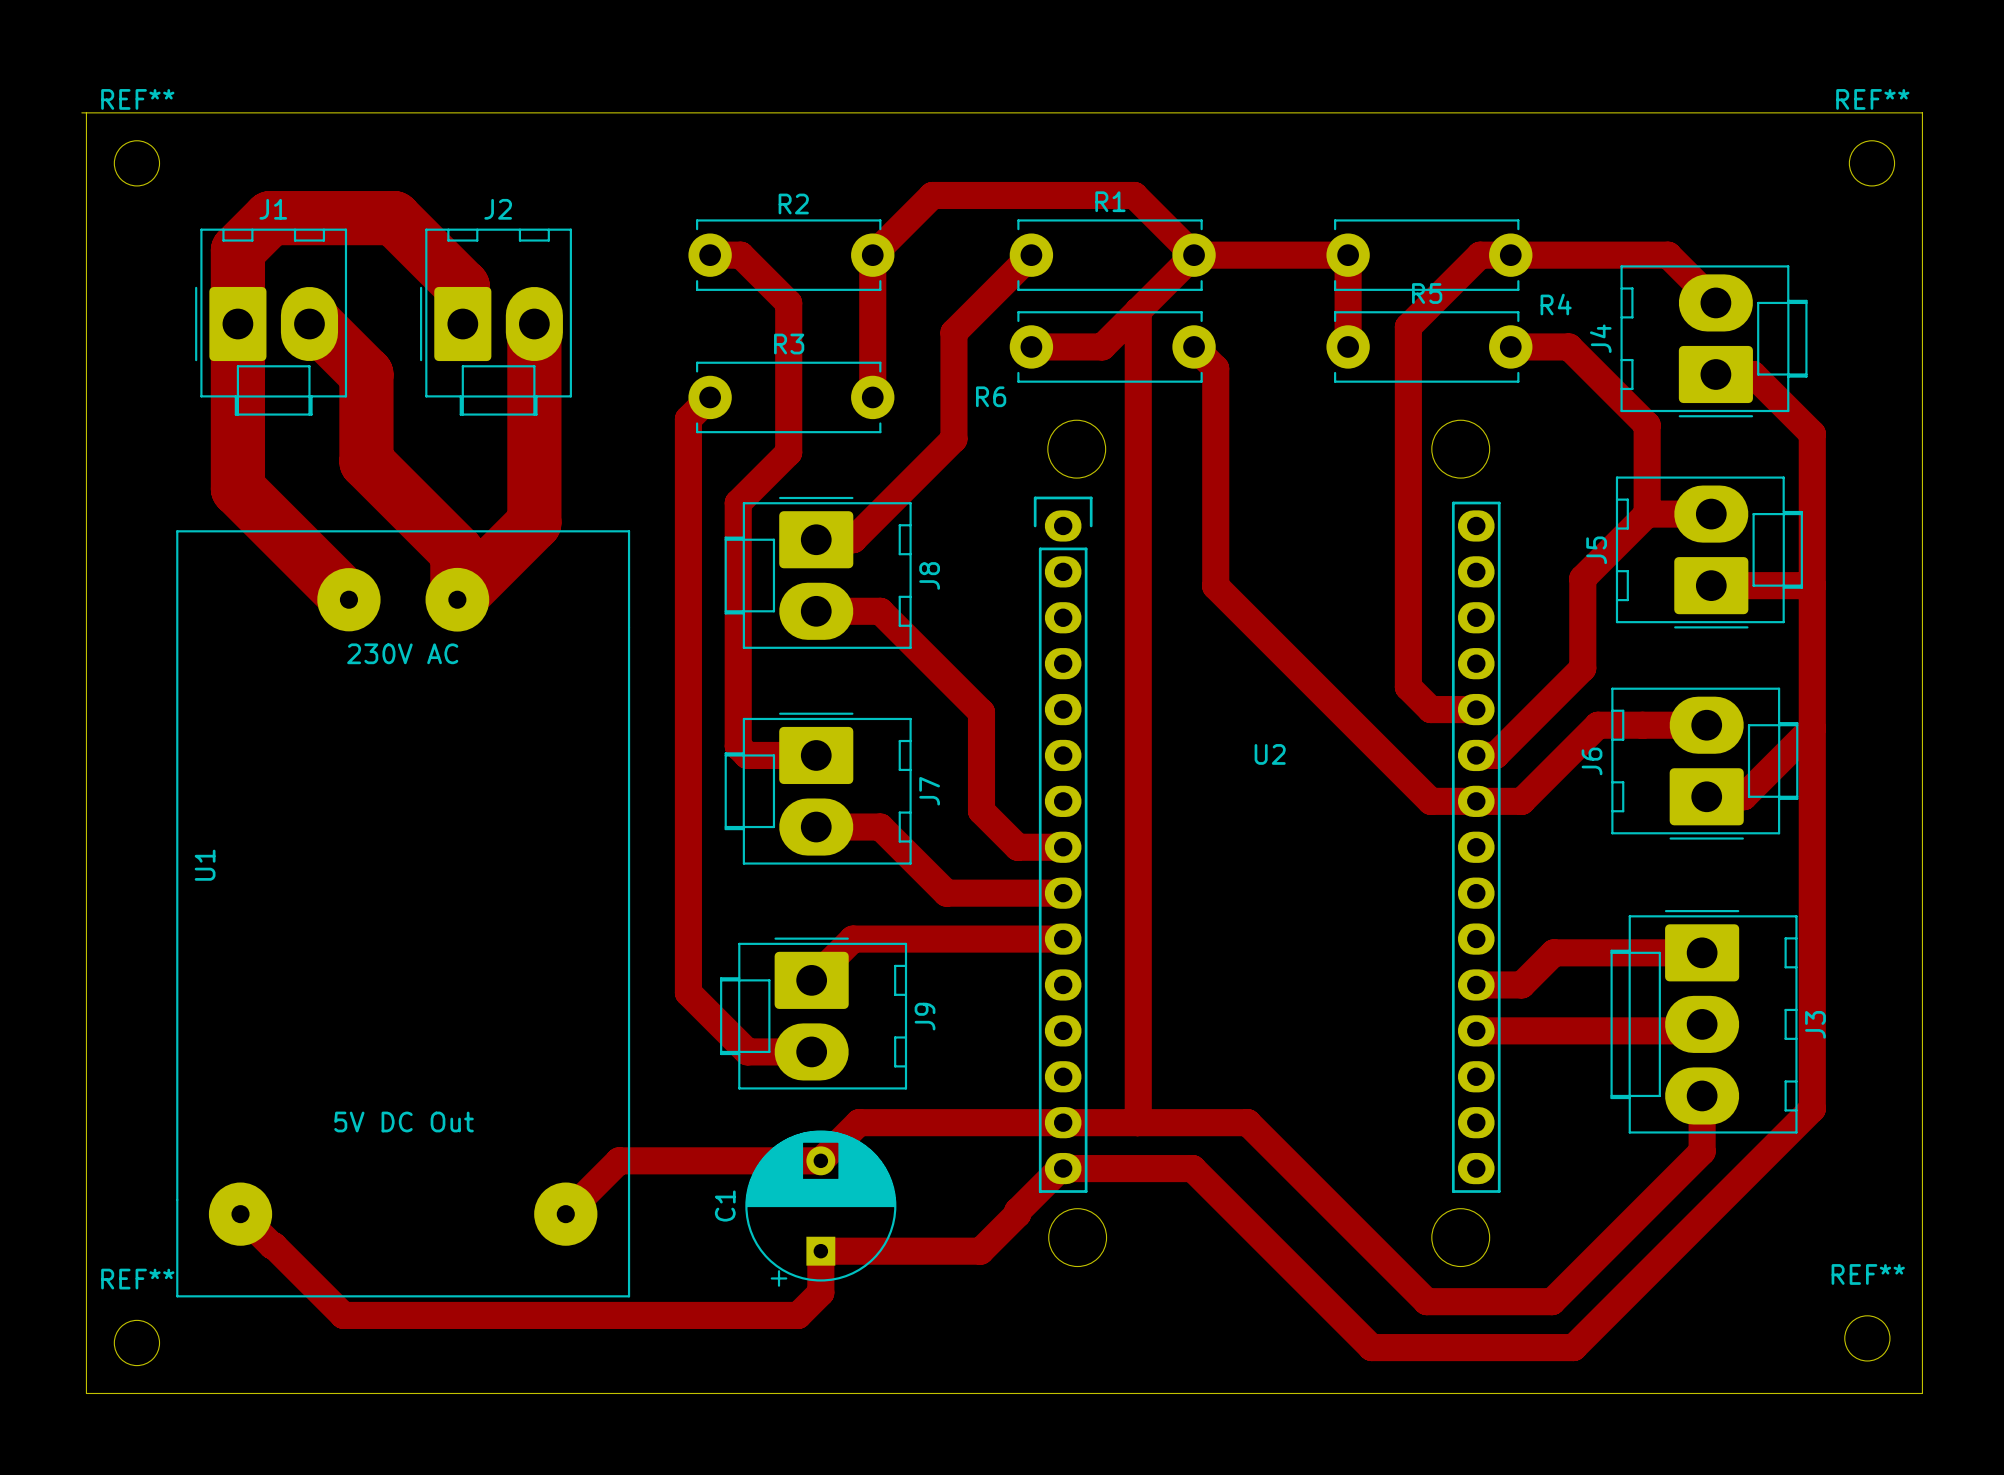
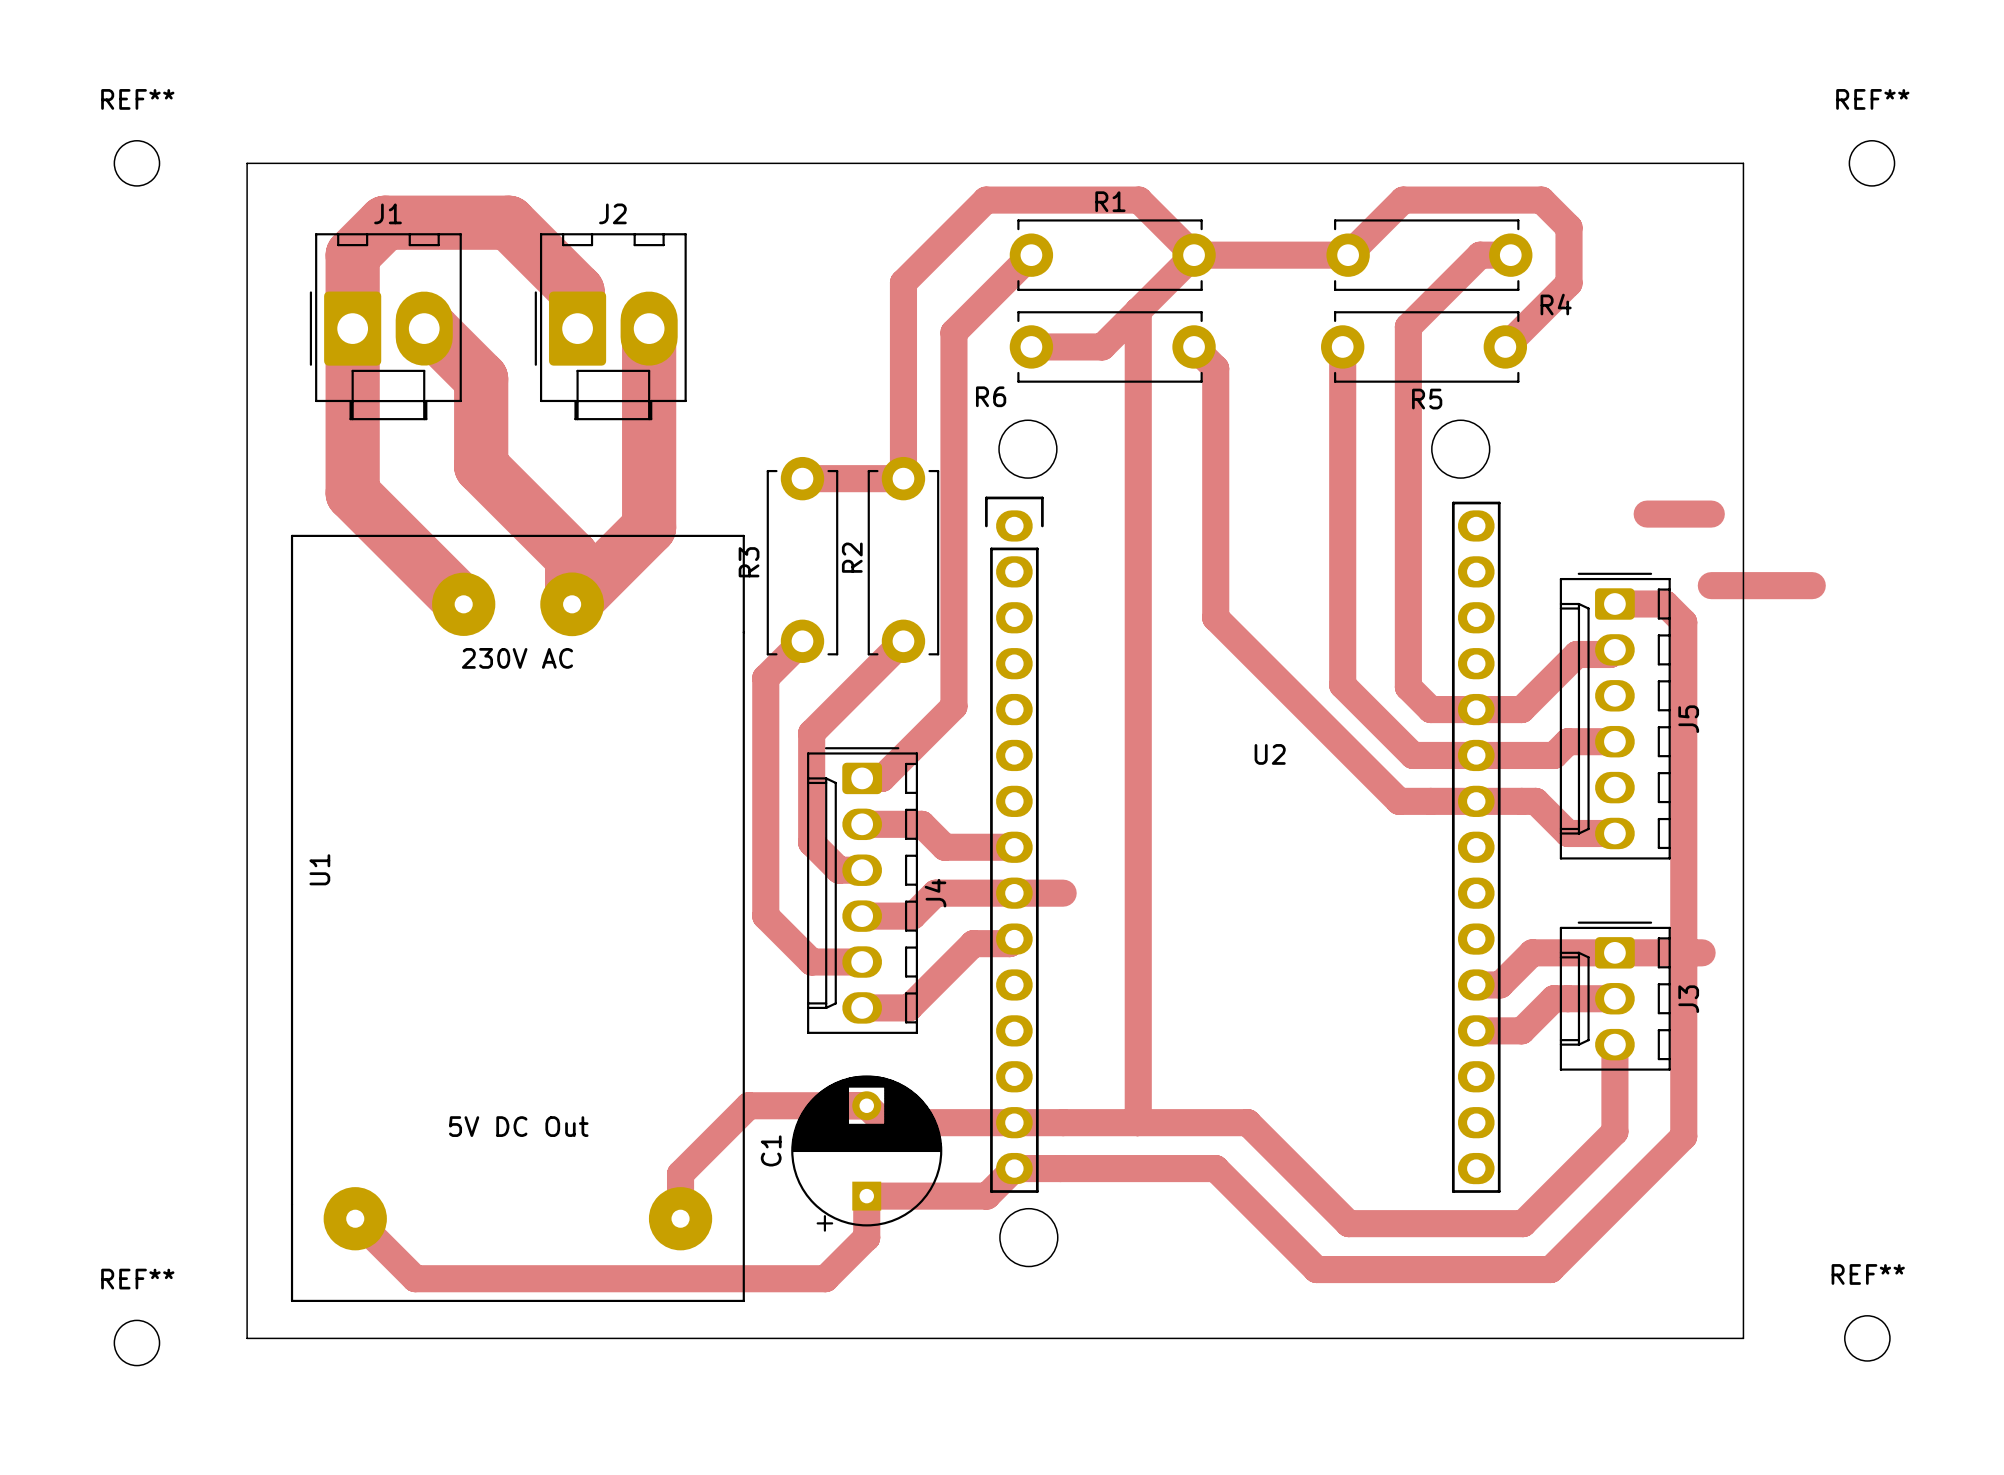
board edge: (81, 112) (1922, 112) (1922, 1393) (86, 1393) (86, 112) -> none
board edge: none -> (247, 163) (1743, 163) (1743, 1338) (247, 1338) (247, 163)
top track: (1138, 200) (1134, 195) (932, 195) (872, 255) (872, 397) -> (1138, 200) (986, 200) (903, 282) (903, 478) (802, 478)
top track: (710, 255) (740, 255) (788, 303) (788, 452) (738, 503) (738, 746) (747, 755) (816, 755) -> none
R2 rotation: 0° (791, 255) -> 90° counterclockwise (903, 559)
R2 position: (791, 255) -> (903, 559)
top track: (1348, 255) (1348, 346) -> (1348, 255) (1403, 200) (1541, 200) (1569, 227) (1569, 283) (1505, 346)
top track: (1510, 255) (1668, 255) (1715, 302) -> none
J4 footprint: [1620, 265, 1808, 418] -> [807, 747, 918, 1034]
J1 position: (271, 322) -> (385, 326)
J2 position: (495, 322) -> (610, 326)
top track: (309, 324) (315, 324) (366, 374) (366, 461) (457, 552) (457, 599) (534, 522) (534, 324) -> (424, 328) (430, 328) (481, 379) (481, 466) (572, 557) (572, 604) (649, 527) (649, 328)
top track: (462, 324) (462, 286) (393, 218) (270, 218) (237, 250) (237, 488) (348, 599) -> (577, 328) (577, 291) (508, 222) (385, 222) (352, 255) (352, 493) (463, 604)
J4 name position: J4 (1600, 338) -> J4 (935, 893)
top track: none -> (1342, 346) (1342, 685) (1412, 755) (1476, 755)
R5 rotation: 0° (1429, 346) -> 180° (1424, 346)
top track: (1510, 346) (1569, 346) (1647, 425) (1647, 514) (1582, 578) (1582, 668) (1495, 755) -> (1614, 741) (1567, 741) (1554, 755) (1495, 755)
top track: (1715, 374) (1752, 374) (1812, 433) (1812, 1108) (1573, 1347) (1371, 1347) (1192, 1168) -> (1614, 603) (1665, 603) (1683, 622) (1683, 1136) (1550, 1269) (1316, 1269) (1215, 1168) (1192, 1168)
top track: (710, 397) (688, 419) (688, 992) (747, 1051) (811, 1051) -> none
R3 rotation: 0° (791, 397) -> 90° counterclockwise (802, 559)
R3 position: (791, 397) -> (802, 559)
U2 footprint: [1033, 420, 1501, 1267] -> [985, 420, 1501, 1267]
top track: (953, 439) (853, 539) (816, 539) -> (953, 439) (953, 706) (882, 778) (862, 778)
J5 footprint: [1615, 476, 1803, 629] -> [1559, 572, 1671, 860]
J5 name position: J5 (1596, 550) -> J5 (1688, 719)
J8: (818, 572) -> none
top track: (1215, 586) (1430, 801) -> (1215, 586) (1215, 617) (1399, 801) (1430, 801)
top track: (816, 611) (880, 611) (981, 712) (981, 811) (1017, 847) (1063, 847) -> none
top track: none -> (802, 641) (765, 678) (765, 916) (811, 962) (862, 962)
top track: none -> (903, 641) (811, 733) (811, 842) (839, 870) (862, 870)
top track: none -> (1614, 649) (1610, 654) (1576, 654) (1521, 709) (1476, 709)
top track: (1706, 725) (1597, 725) (1521, 801) -> (1614, 833) (1567, 833) (1535, 801) (1521, 801)
top track: (1812, 728) (1743, 796) (1706, 796) -> none
J6: (1704, 763) -> none
J7: (818, 788) -> none
top track: none -> (862, 824) (921, 824) (944, 847) (1014, 847)
top track: (816, 827) (880, 827) (946, 893) -> (862, 916) (912, 916) (935, 893) (946, 893)
J3 footprint: [1610, 910, 1798, 1134] -> [1559, 921, 1671, 1071]
U1 position: (403, 913) -> (517, 918)
top track: none -> (1014, 939) (1009, 943) (973, 943) (909, 1007) (862, 1007)
top track: (1063, 939) (852, 939) (811, 980) -> none
top track: (1553, 952) (1521, 984) (1500, 984) -> (1553, 952) (1532, 952) (1500, 984)
J9: (813, 1013) -> none
top track: (1702, 1024) (1695, 1030) (1521, 1030) -> (1614, 998) (1553, 998) (1521, 1030)
J3 name position: J3 (1815, 1024) -> J3 (1688, 999)
top track: (1702, 1095) (1702, 1151) (1552, 1301) (1426, 1301) (1348, 1223) -> (1614, 1044) (1614, 1131) (1523, 1223) (1348, 1223)
top track: (883, 1122) (859, 1122) (820, 1160) (619, 1160) (565, 1214) -> (883, 1122) (866, 1105) (748, 1105) (680, 1174) (680, 1218)
top track: (1060, 1168) (980, 1251) (820, 1251) (820, 1292) (798, 1315) (343, 1315) (240, 1214) -> (1060, 1168) (1014, 1168) (986, 1196) (866, 1196) (866, 1237)
C1 position: (820, 1208) -> (866, 1153)
top track: none -> (355, 1218) (415, 1278) (825, 1278) (866, 1237)

